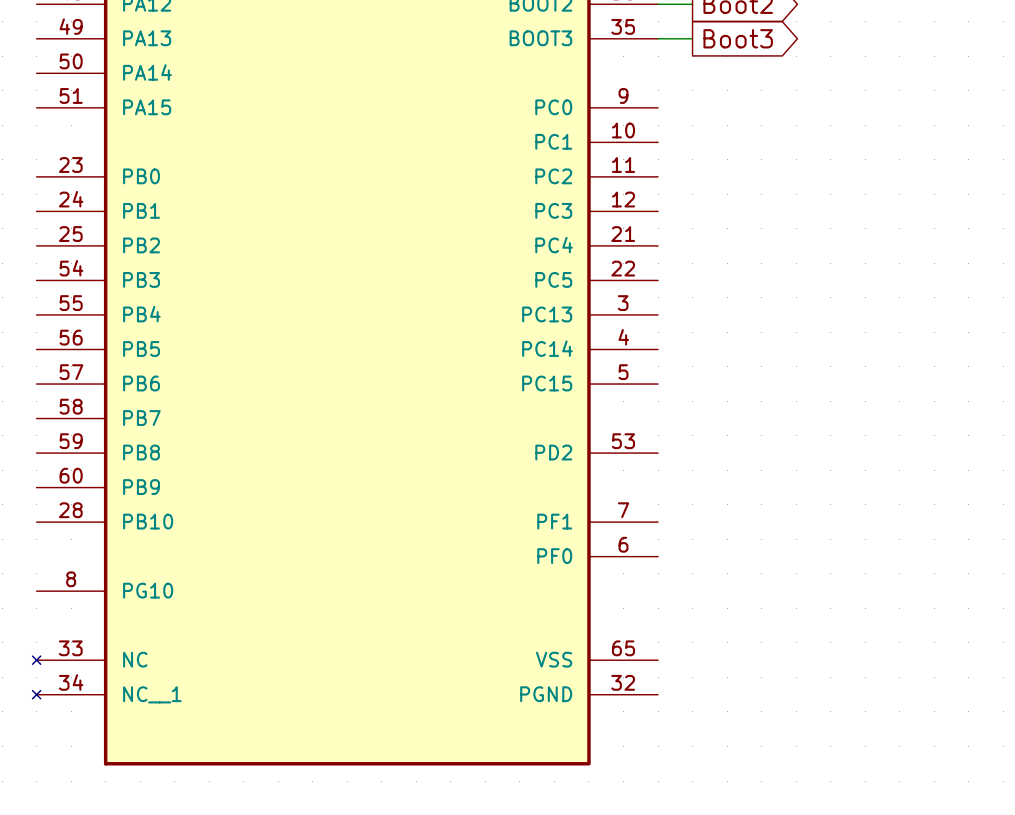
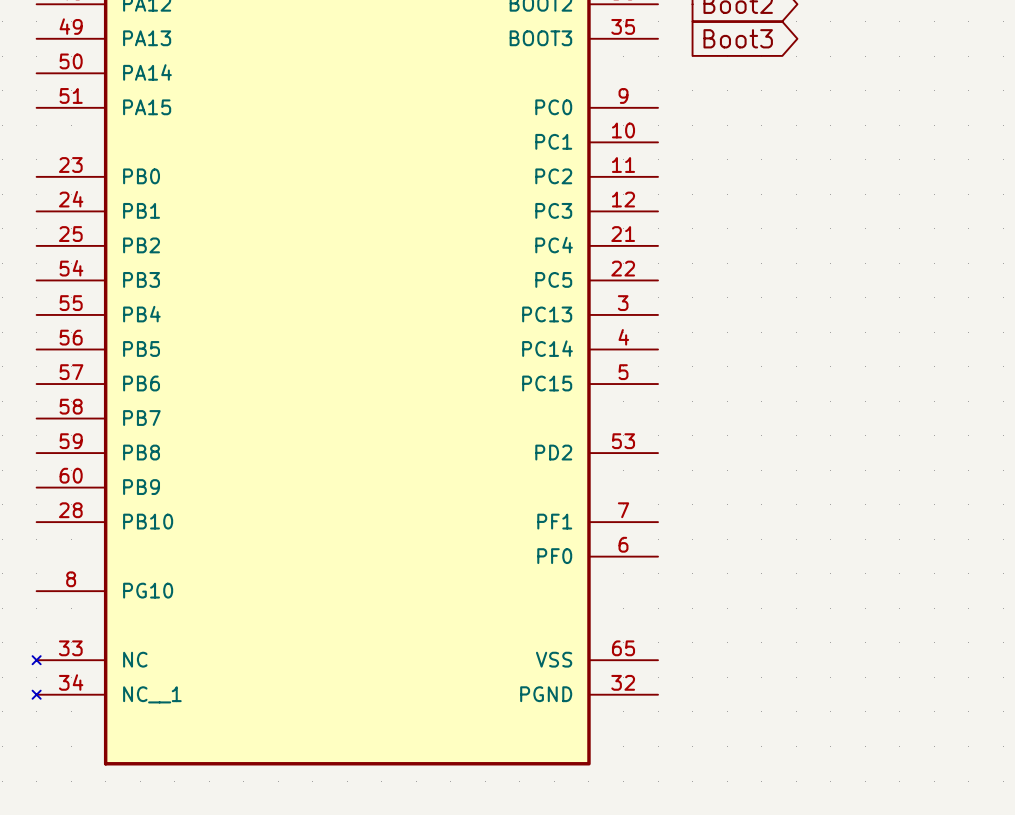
wire: (658, 4) (692, 4) -> none
wire: (658, 38) (692, 38) -> none

